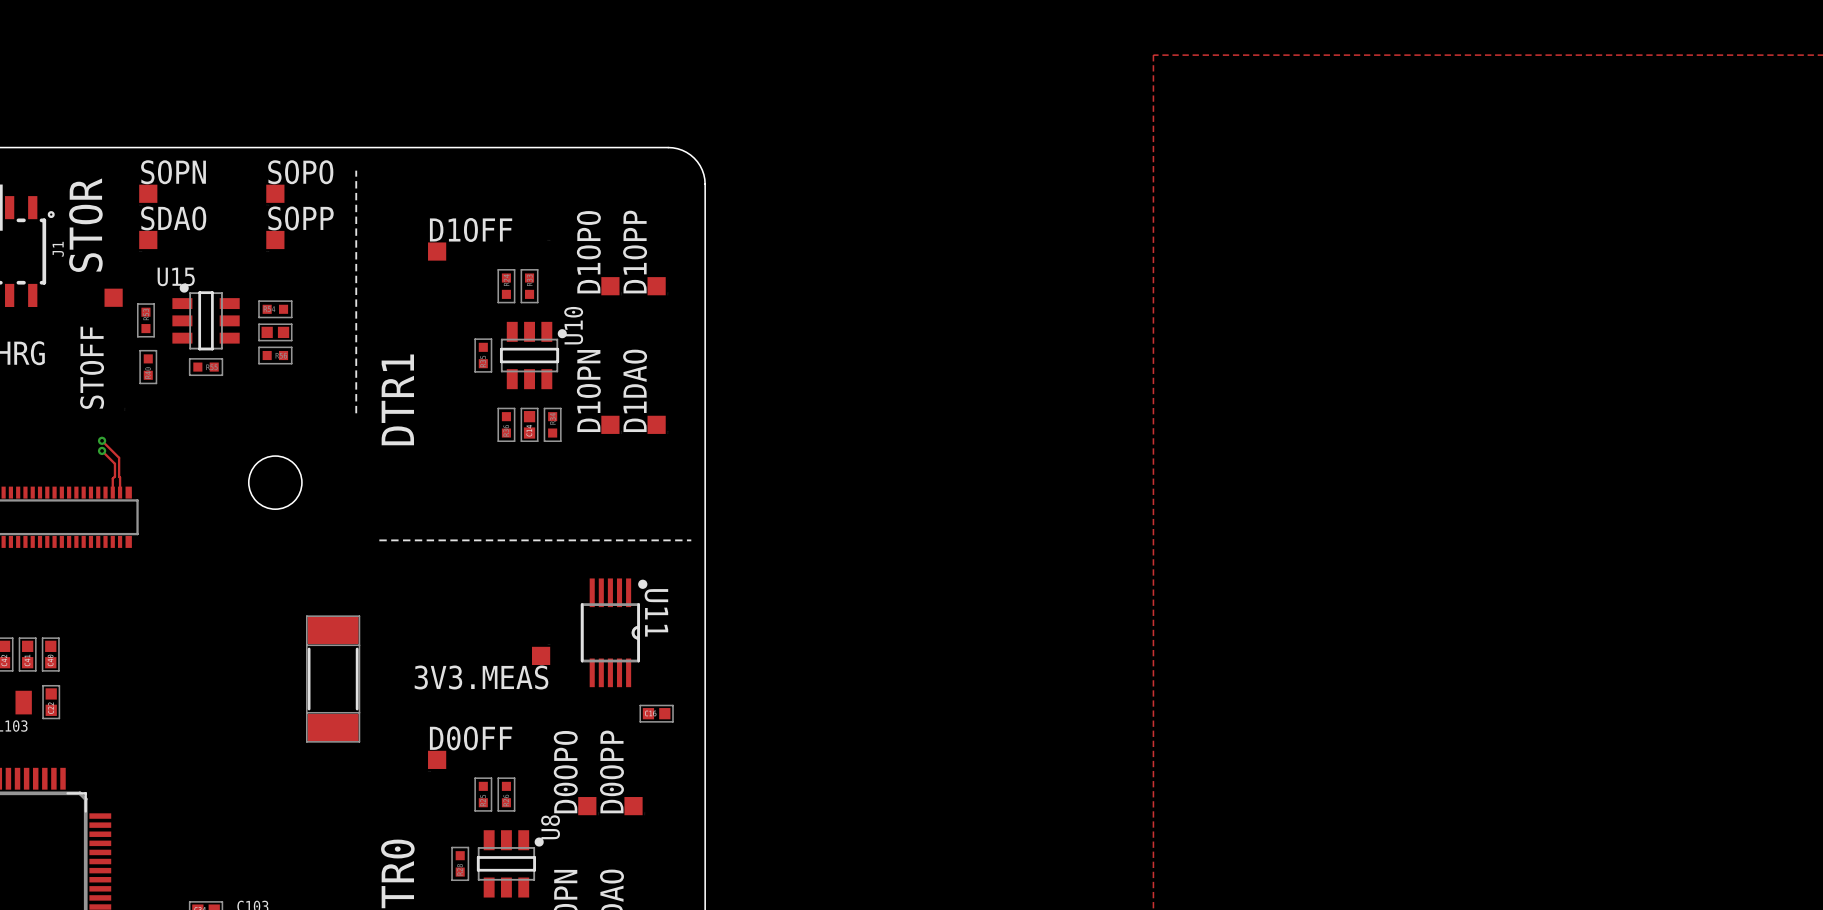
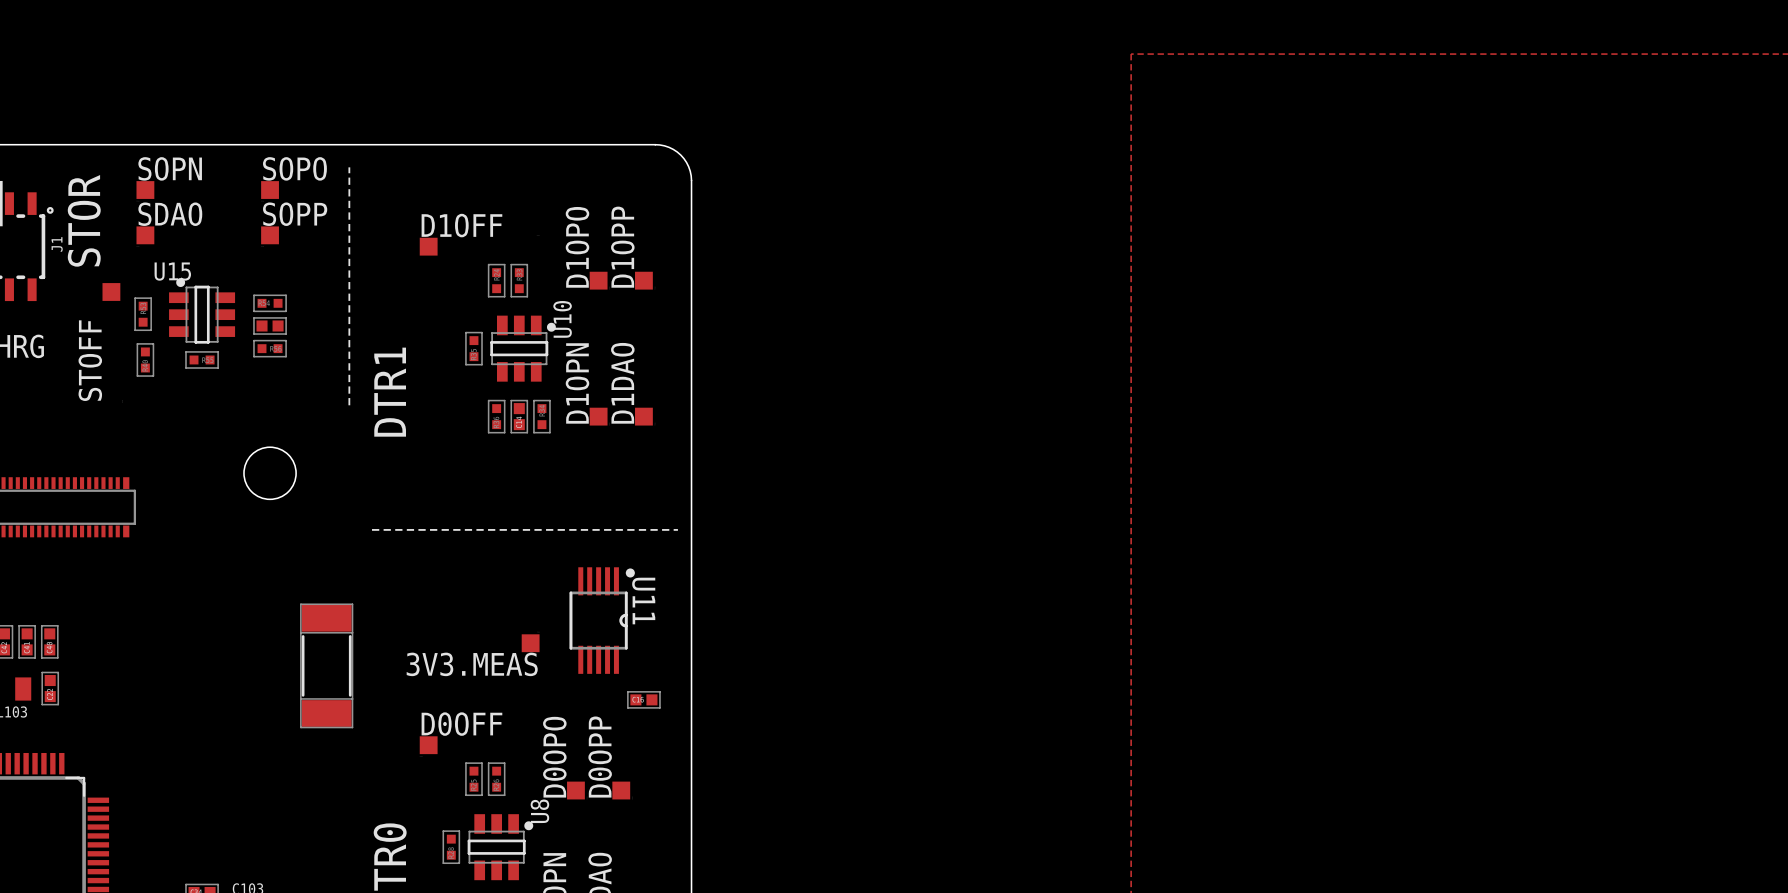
track: (102, 440) (119, 457) (120, 492) -> none
via: (102, 440) -> none
track: (102, 450) (114, 463) (112, 492) -> none
via: (102, 450) -> none

